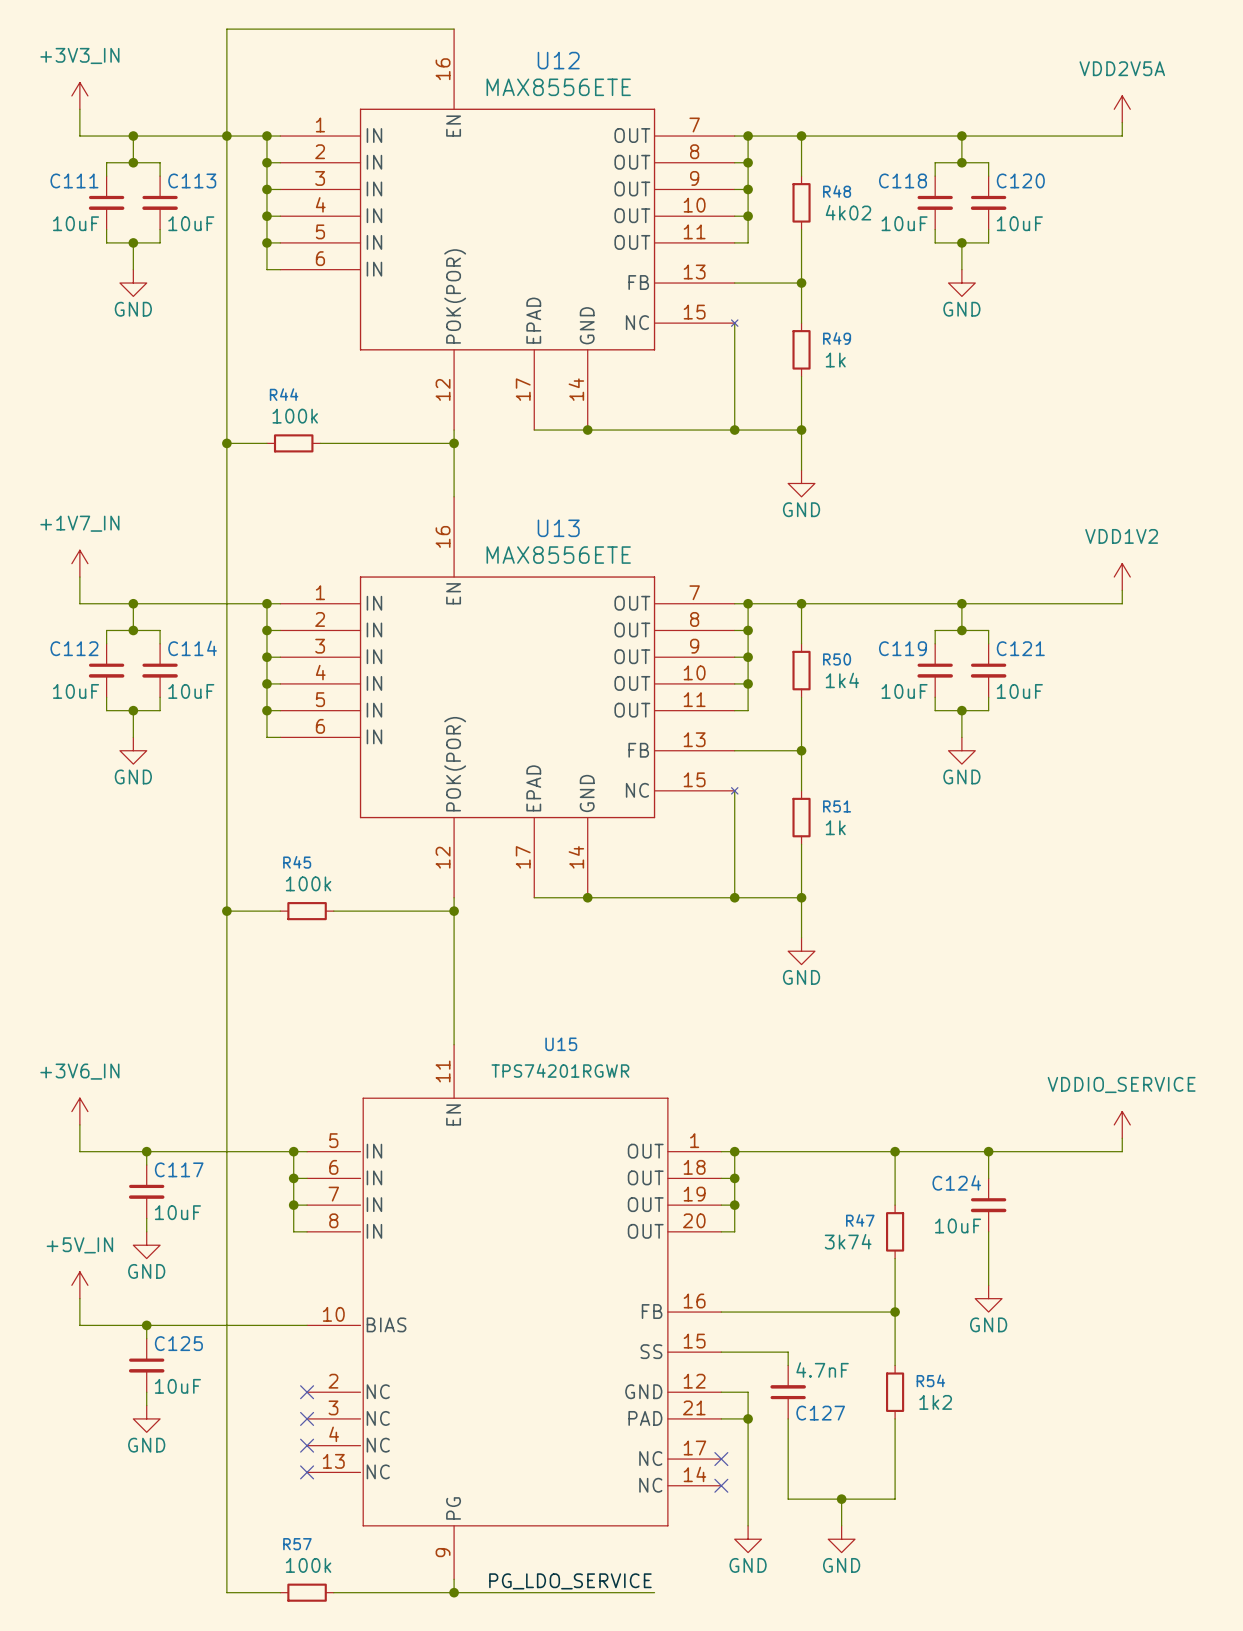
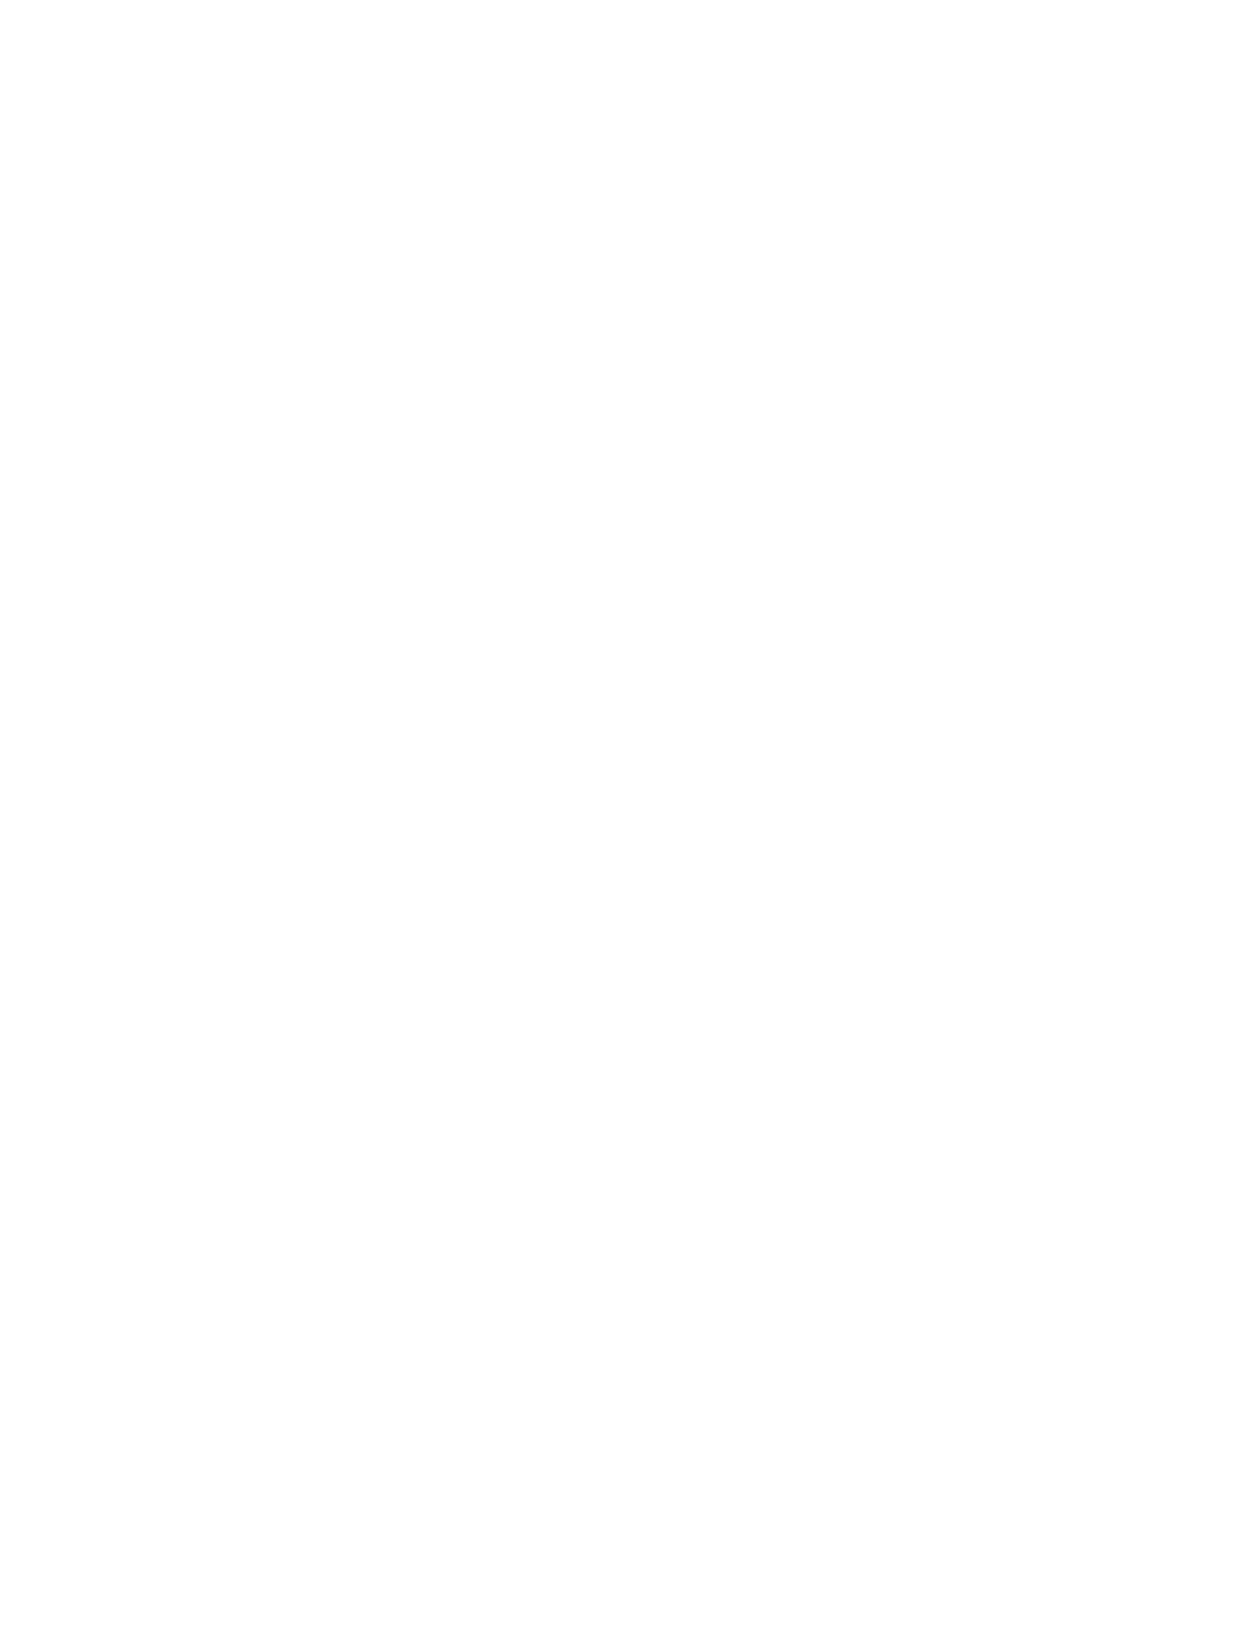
wire: (454, 29) (226, 29) (226, 1592) (280, 1592) -> none
power symbol: +3V3_IN (79, 95) -> none
wire: (79, 109) (79, 136) (280, 136) -> none
power symbol: VDD2V5A (1122, 109) -> none
wire: (1122, 122) (1122, 136) (734, 136) -> none
wire: (133, 136) (133, 162) -> none
junction: (133, 136) -> none
junction: (226, 136) -> none
wire: (266, 136) (266, 269) (280, 269) -> none
junction: (266, 136) -> none
wire: (748, 136) (748, 242) (734, 242) -> none
junction: (748, 136) -> none
wire: (801, 136) (801, 176) -> none
junction: (801, 136) -> none
wire: (961, 136) (961, 162) -> none
junction: (961, 136) -> none
junction: (133, 162) -> none
wire: (266, 162) (280, 162) -> none
junction: (266, 162) -> none
wire: (734, 162) (748, 162) -> none
junction: (748, 162) -> none
junction: (961, 162) -> none
wire: (106, 176) (106, 162) (160, 162) (160, 176) -> none
wire: (935, 176) (935, 162) (988, 162) (988, 176) -> none
wire: (266, 189) (280, 189) -> none
junction: (266, 189) -> none
wire: (734, 189) (748, 189) -> none
junction: (748, 189) -> none
C111: 10uF (106, 202) -> none
C113: 10uF (160, 202) -> none
R48: 4k02 (801, 202) -> none
C118: 10uF (935, 202) -> none
C120: 10uF (988, 202) -> none
wire: (266, 216) (280, 216) -> none
junction: (266, 216) -> none
wire: (734, 216) (748, 216) -> none
junction: (748, 216) -> none
wire: (106, 229) (106, 242) (160, 242) (160, 229) -> none
U12: MAX8556ETE (509, 229) -> none
wire: (801, 229) (801, 323) -> none
wire: (935, 229) (935, 242) (988, 242) (988, 229) -> none
wire: (133, 242) (133, 269) -> none
junction: (133, 242) -> none
wire: (266, 242) (280, 242) -> none
junction: (266, 242) -> none
wire: (961, 242) (961, 269) -> none
junction: (961, 242) -> none
power symbol: GND (133, 283) -> none
wire: (734, 283) (801, 283) -> none
junction: (801, 283) -> none
power symbol: GND (961, 283) -> none
wire: (734, 323) (734, 430) -> none
R49: 1k (801, 349) -> none
wire: (801, 376) (801, 470) -> none
wire: (454, 430) (454, 496) -> none
wire: (534, 430) (801, 430) -> none
junction: (587, 430) -> none
junction: (734, 430) -> none
junction: (801, 430) -> none
wire: (226, 443) (266, 443) -> none
junction: (226, 443) -> none
R44: 100k (293, 443) -> none
wire: (320, 443) (454, 443) -> none
junction: (454, 443) -> none
power symbol: GND (801, 483) -> none
power symbol: +1V7_IN (79, 563) -> none
wire: (79, 577) (79, 603) (280, 603) -> none
power symbol: VDD1V2 (1122, 577) -> none
wire: (1122, 590) (1122, 603) (734, 603) -> none
wire: (133, 603) (133, 630) -> none
junction: (133, 603) -> none
wire: (266, 603) (266, 737) (280, 737) -> none
junction: (266, 603) -> none
wire: (748, 603) (748, 710) (734, 710) -> none
junction: (748, 603) -> none
wire: (801, 603) (801, 643) -> none
junction: (801, 603) -> none
wire: (961, 603) (961, 630) -> none
junction: (961, 603) -> none
junction: (133, 630) -> none
wire: (266, 630) (280, 630) -> none
junction: (266, 630) -> none
wire: (734, 630) (748, 630) -> none
junction: (748, 630) -> none
junction: (961, 630) -> none
wire: (106, 643) (106, 630) (160, 630) (160, 643) -> none
wire: (935, 643) (935, 630) (988, 630) (988, 643) -> none
wire: (266, 657) (280, 657) -> none
junction: (266, 657) -> none
wire: (734, 657) (748, 657) -> none
junction: (748, 657) -> none
C112: 10uF (106, 670) -> none
C114: 10uF (160, 670) -> none
R50: 1k4 (801, 670) -> none
C119: 10uF (935, 670) -> none
C121: 10uF (988, 670) -> none
wire: (266, 683) (280, 683) -> none
junction: (266, 683) -> none
wire: (734, 683) (748, 683) -> none
junction: (748, 683) -> none
wire: (106, 697) (106, 710) (160, 710) (160, 697) -> none
U13: MAX8556ETE (509, 697) -> none
wire: (801, 697) (801, 790) -> none
wire: (935, 697) (935, 710) (988, 710) (988, 697) -> none
wire: (133, 710) (133, 737) -> none
junction: (133, 710) -> none
wire: (266, 710) (280, 710) -> none
junction: (266, 710) -> none
wire: (961, 710) (961, 737) -> none
junction: (961, 710) -> none
power symbol: GND (133, 750) -> none
wire: (734, 750) (801, 750) -> none
junction: (801, 750) -> none
power symbol: GND (961, 750) -> none
wire: (734, 790) (734, 897) -> none
R51: 1k (801, 817) -> none
wire: (801, 844) (801, 937) -> none
wire: (454, 897) (454, 1044) -> none
wire: (534, 897) (801, 897) -> none
junction: (587, 897) -> none
junction: (734, 897) -> none
junction: (801, 897) -> none
wire: (226, 911) (280, 911) -> none
junction: (226, 911) -> none
R45: 100k (307, 911) -> none
wire: (333, 911) (454, 911) -> none
junction: (454, 911) -> none
power symbol: GND (801, 951) -> none
power symbol: +3V6_IN (79, 1111) -> none
wire: (79, 1124) (79, 1151) (307, 1151) -> none
power symbol: VDDIO_SERVICE (1122, 1124) -> none
wire: (1122, 1138) (1122, 1151) (721, 1151) -> none
wire: (146, 1151) (146, 1165) -> none
junction: (146, 1151) -> none
wire: (293, 1151) (293, 1231) (307, 1231) -> none
junction: (293, 1151) -> none
wire: (734, 1151) (734, 1231) (721, 1231) -> none
junction: (734, 1151) -> none
wire: (895, 1151) (895, 1205) -> none
junction: (895, 1151) -> none
wire: (988, 1151) (988, 1178) -> none
junction: (988, 1151) -> none
wire: (293, 1178) (307, 1178) -> none
junction: (293, 1178) -> none
wire: (721, 1178) (734, 1178) -> none
junction: (734, 1178) -> none
C117: 10uF (146, 1191) -> none
wire: (293, 1205) (307, 1205) -> none
junction: (293, 1205) -> none
wire: (721, 1205) (734, 1205) -> none
junction: (734, 1205) -> none
C124: 10uF (988, 1205) -> none
wire: (146, 1218) (146, 1231) -> none
R47: 3k74 (895, 1231) -> none
wire: (988, 1231) (988, 1285) -> none
power symbol: GND (146, 1245) -> none
wire: (895, 1258) (895, 1365) -> none
power symbol: +5V_IN (79, 1285) -> none
wire: (79, 1298) (79, 1325) (307, 1325) -> none
power symbol: GND (988, 1298) -> none
U15: TPS74201RGWR (514, 1312) -> none
wire: (721, 1312) (895, 1312) -> none
junction: (895, 1312) -> none
wire: (146, 1325) (146, 1338) -> none
junction: (146, 1325) -> none
wire: (721, 1352) (788, 1352) (788, 1365) -> none
C125: 10uF (146, 1365) -> none
wire: (146, 1392) (146, 1405) -> none
no-connect mark: (307, 1392) -> none
wire: (721, 1392) (748, 1392) (748, 1525) -> none
C127: 4.7nF (788, 1392) -> none
R54: 1k2 (895, 1392) -> none
power symbol: GND (146, 1418) -> none
no-connect mark: (307, 1418) -> none
wire: (721, 1418) (748, 1418) -> none
junction: (748, 1418) -> none
wire: (788, 1418) (788, 1499) (895, 1499) (895, 1418) -> none
no-connect mark: (307, 1445) -> none
no-connect mark: (721, 1459) -> none
no-connect mark: (307, 1472) -> none
no-connect mark: (721, 1485) -> none
wire: (841, 1499) (841, 1525) -> none
junction: (841, 1499) -> none
power symbol: GND (748, 1539) -> none
power symbol: GND (841, 1539) -> none
wire: (454, 1579) (454, 1592) -> none
label: PG_LDO_SERVICE (570, 1581) -> none
R57: 100k (307, 1592) -> none
wire: (333, 1592) (654, 1592) -> none
junction: (454, 1592) -> none

